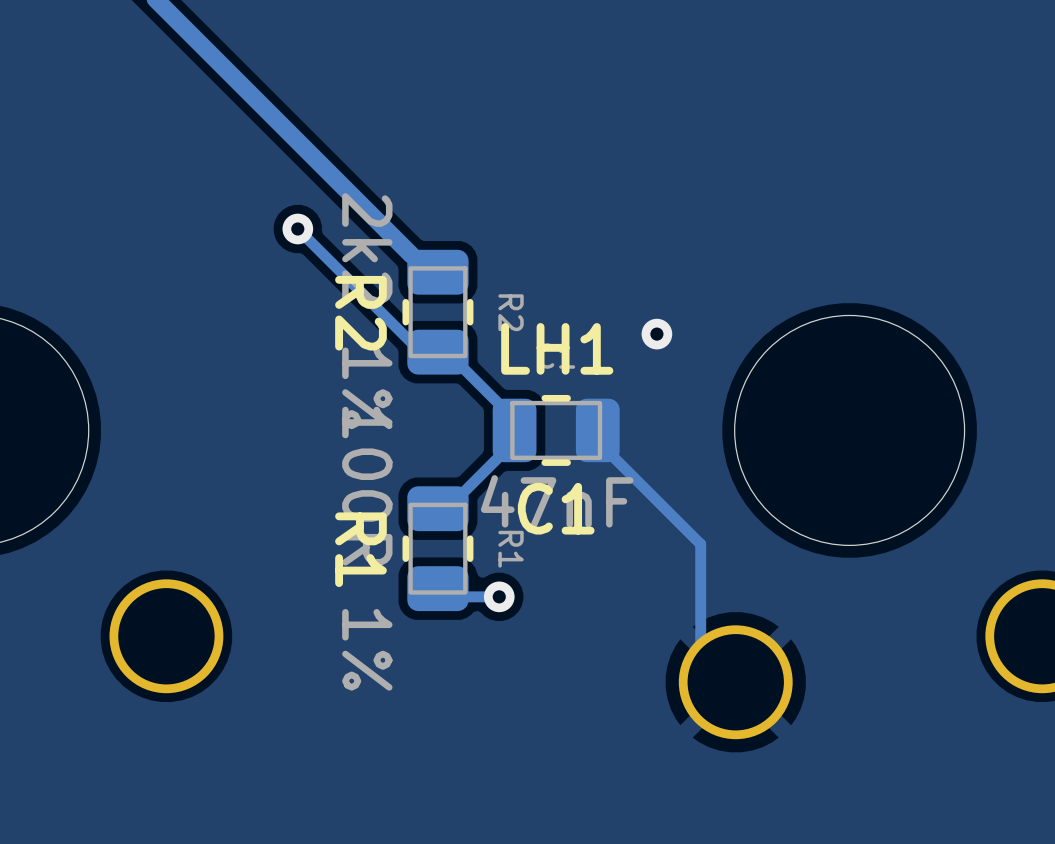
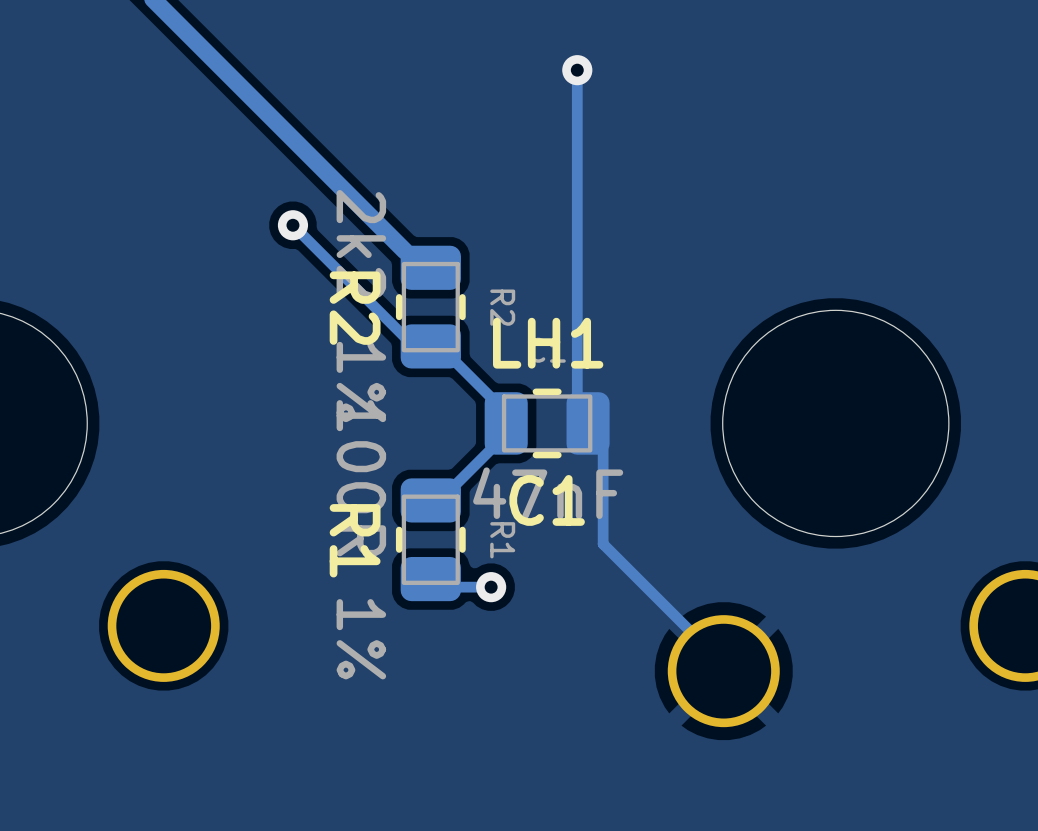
track: none -> (577, 70) (577, 397)
via: none -> (577, 70)
via: (656, 334) -> none
track: (613, 456) (700, 544) (700, 640) -> (603, 449) (603, 544) (689, 630)

